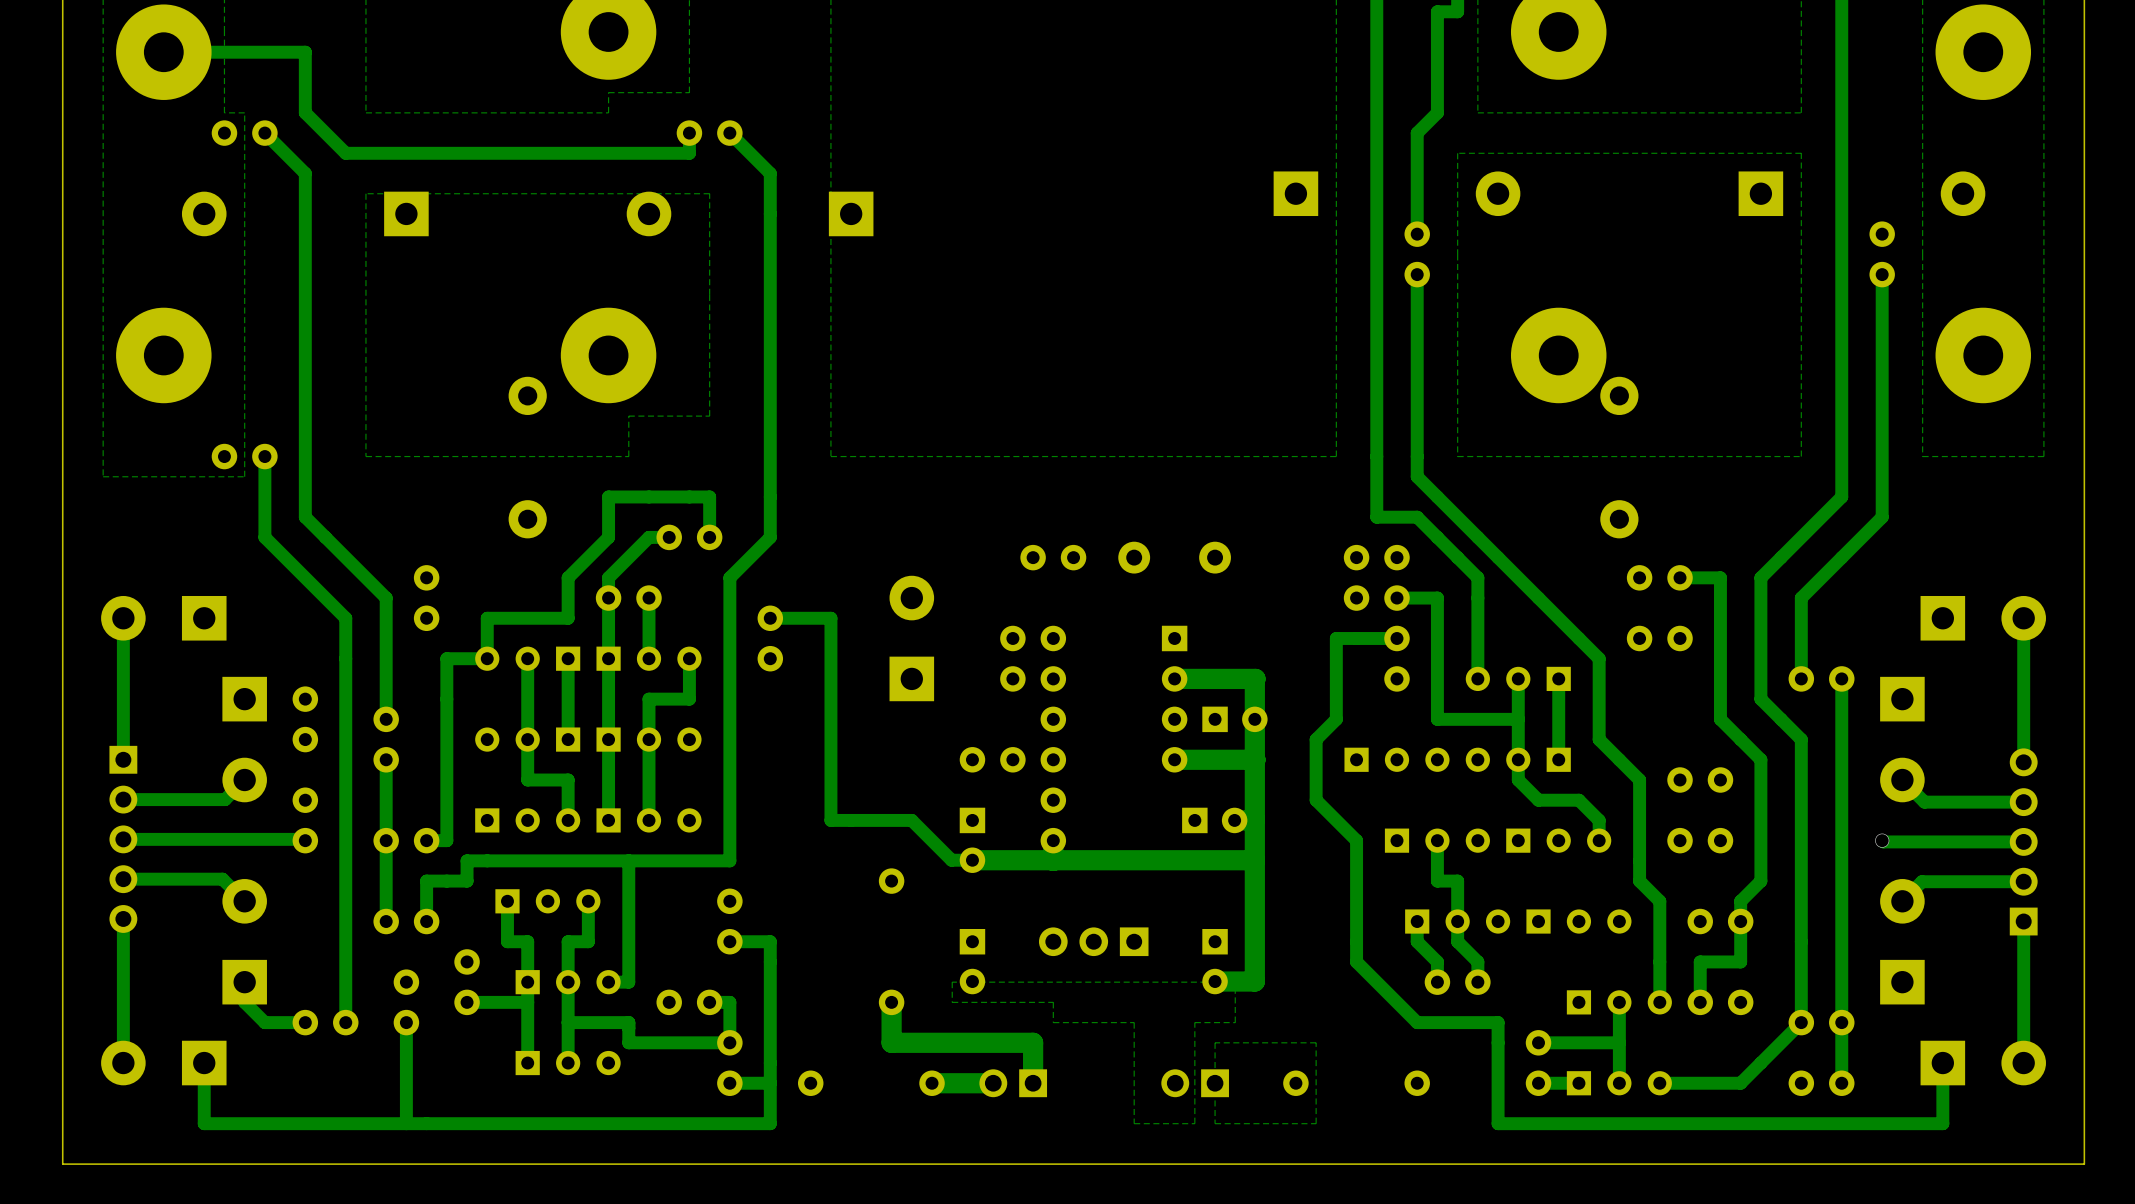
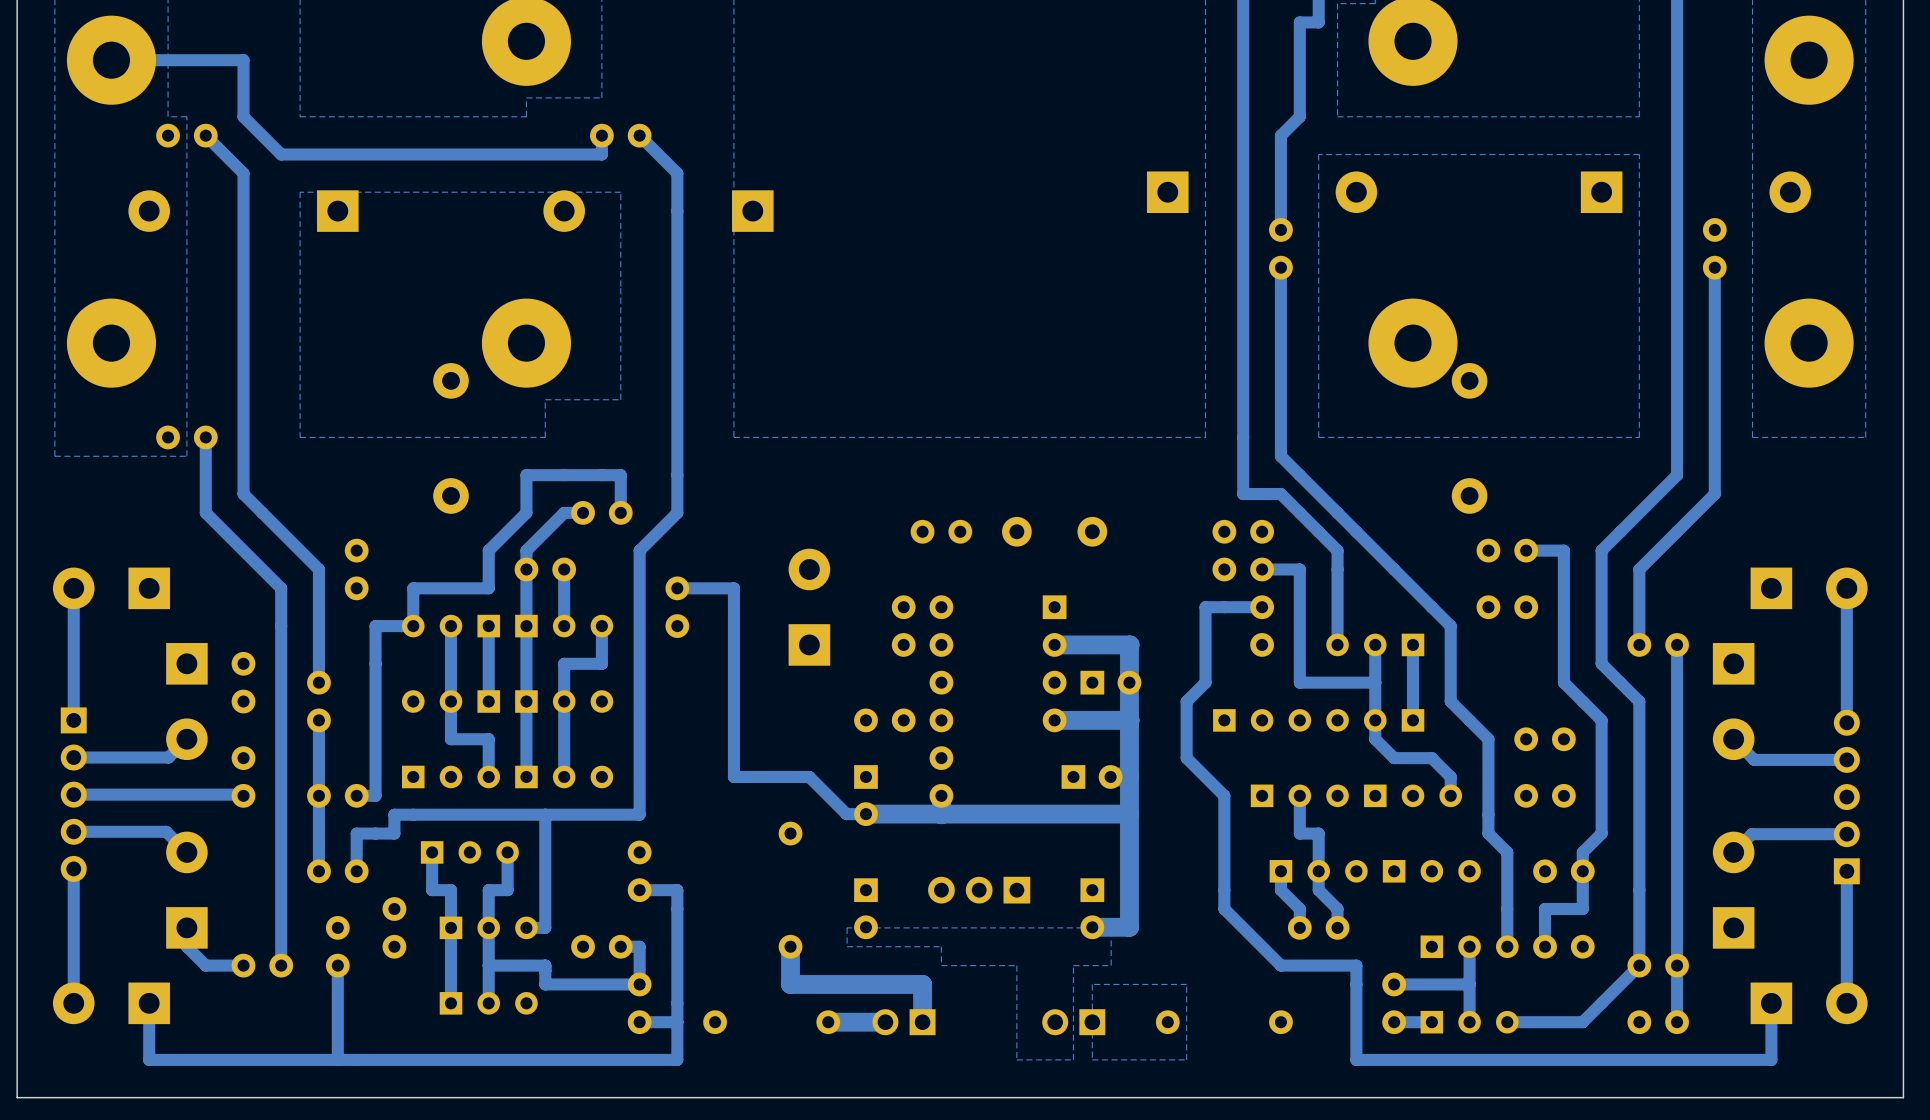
track: (1882, 840) (2023, 841) -> none
via: (1882, 840) -> none
track: (527, 1002) (467, 1002) -> none

